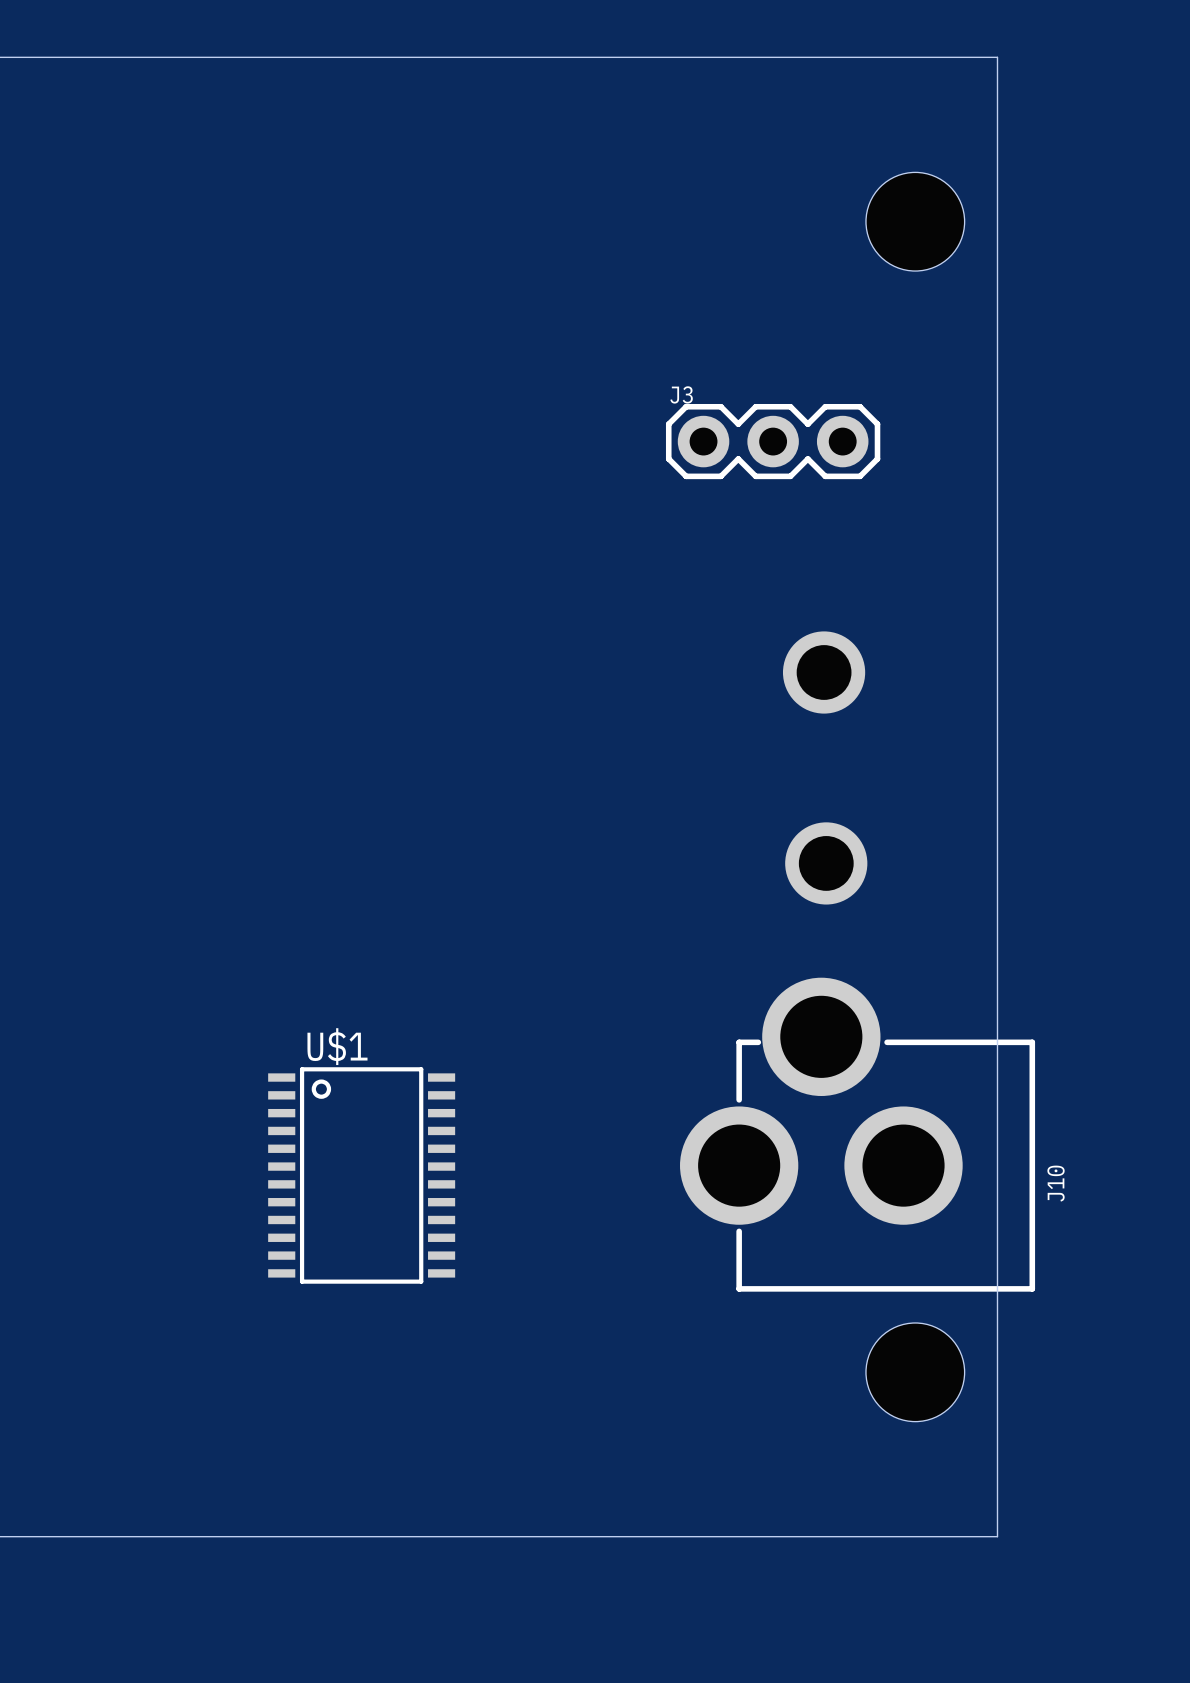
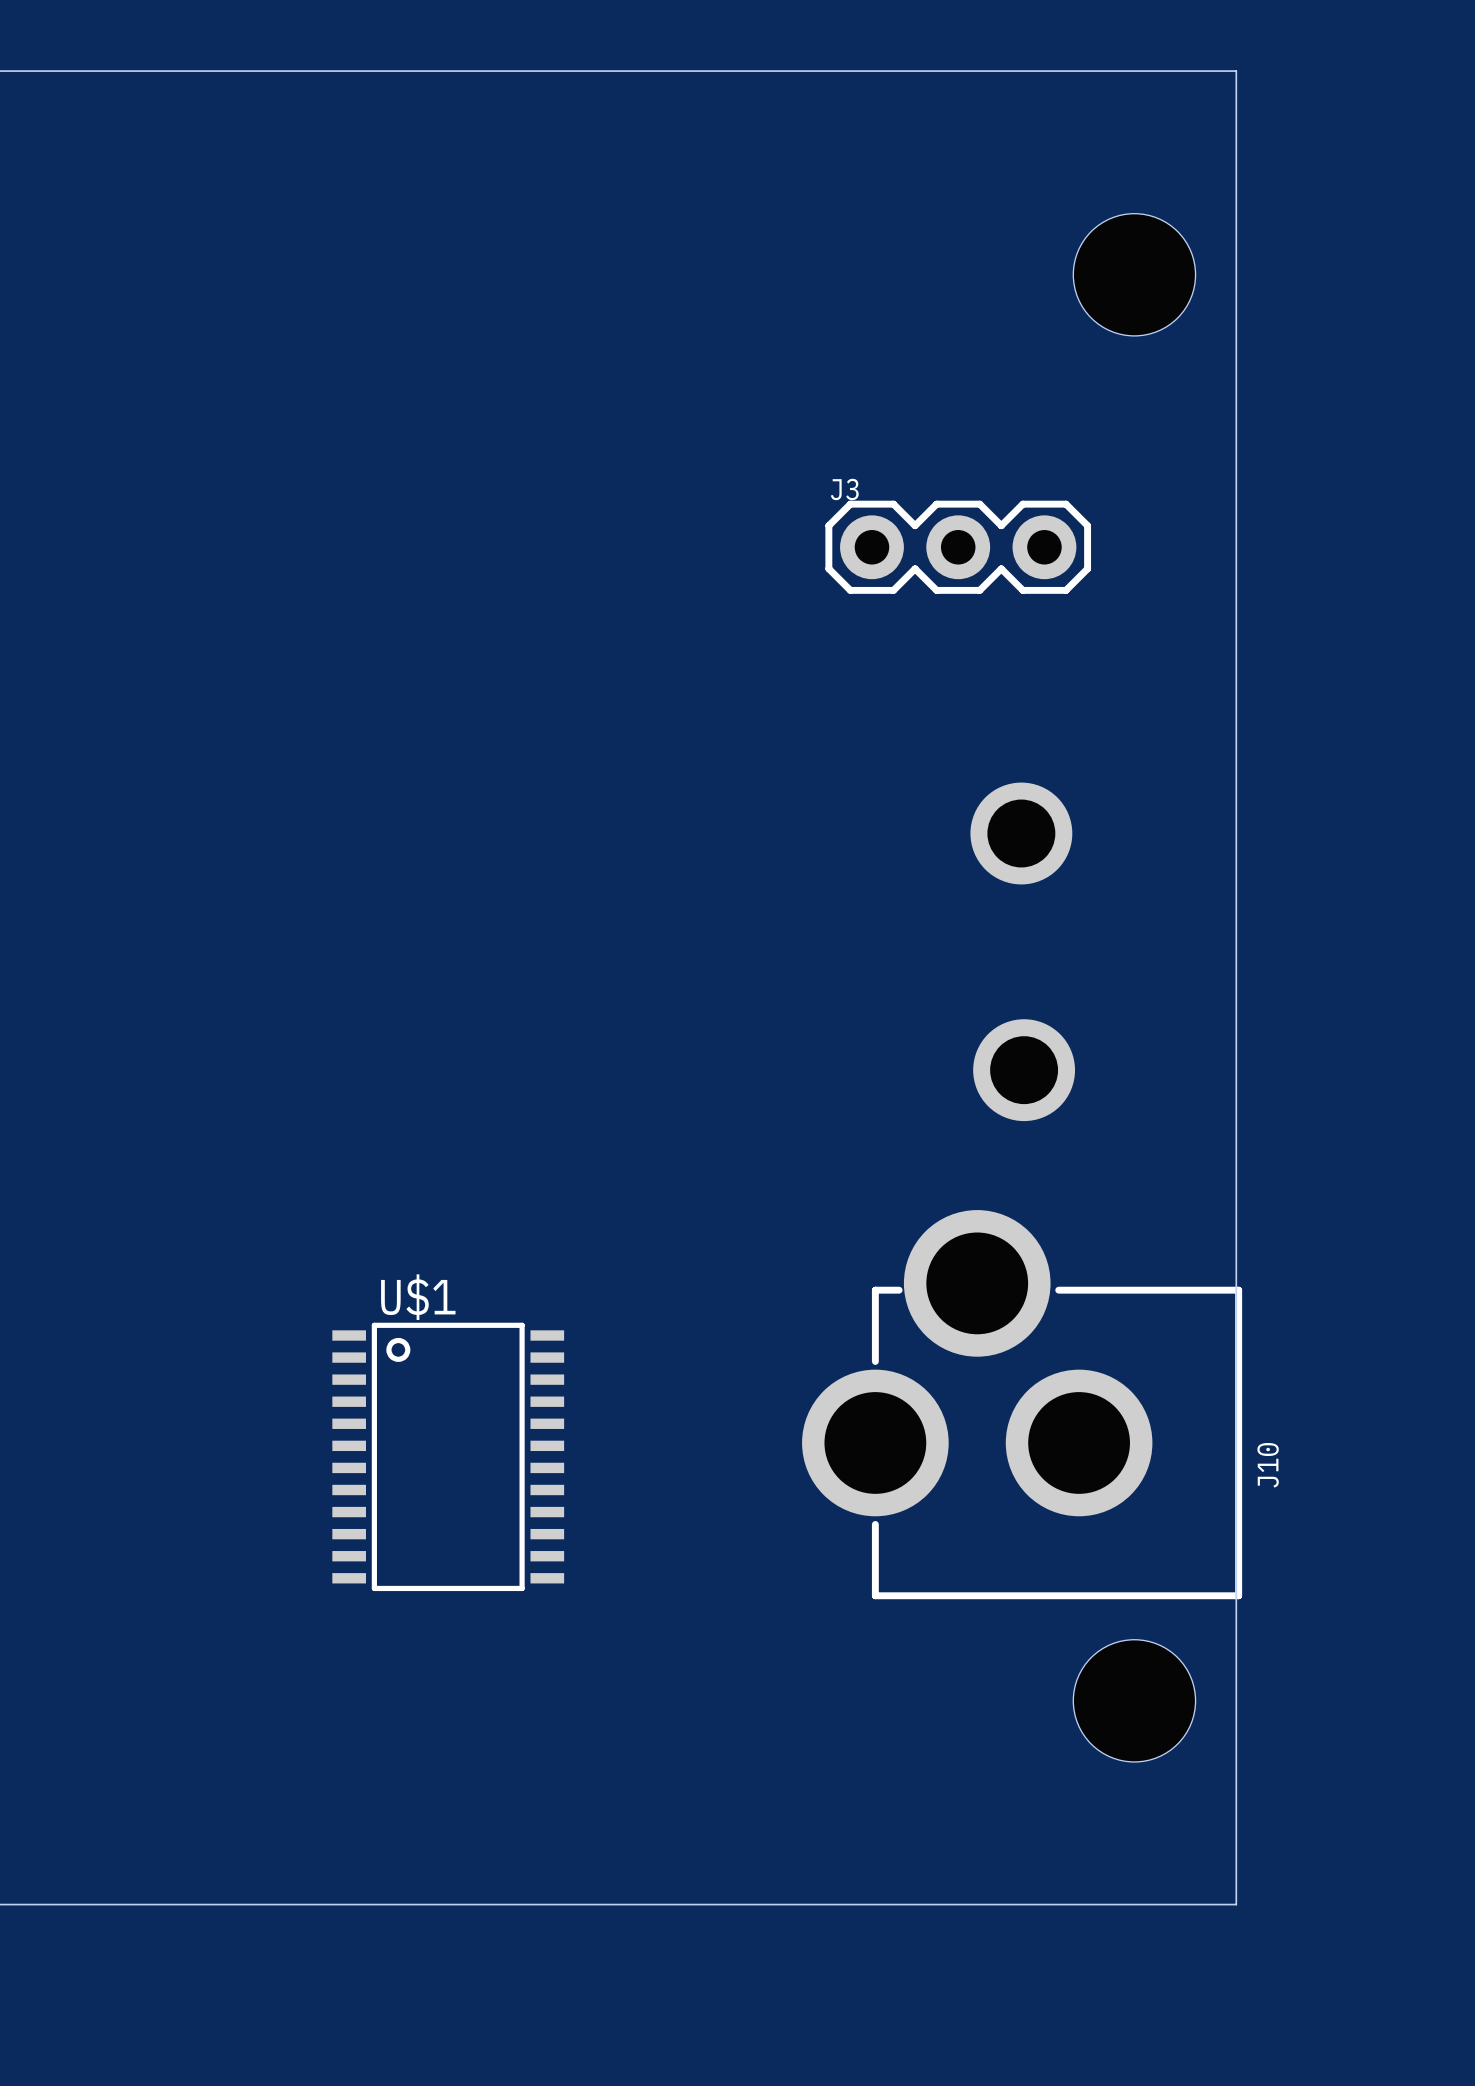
J10 position: (857, 1134) -> (1022, 1404)

